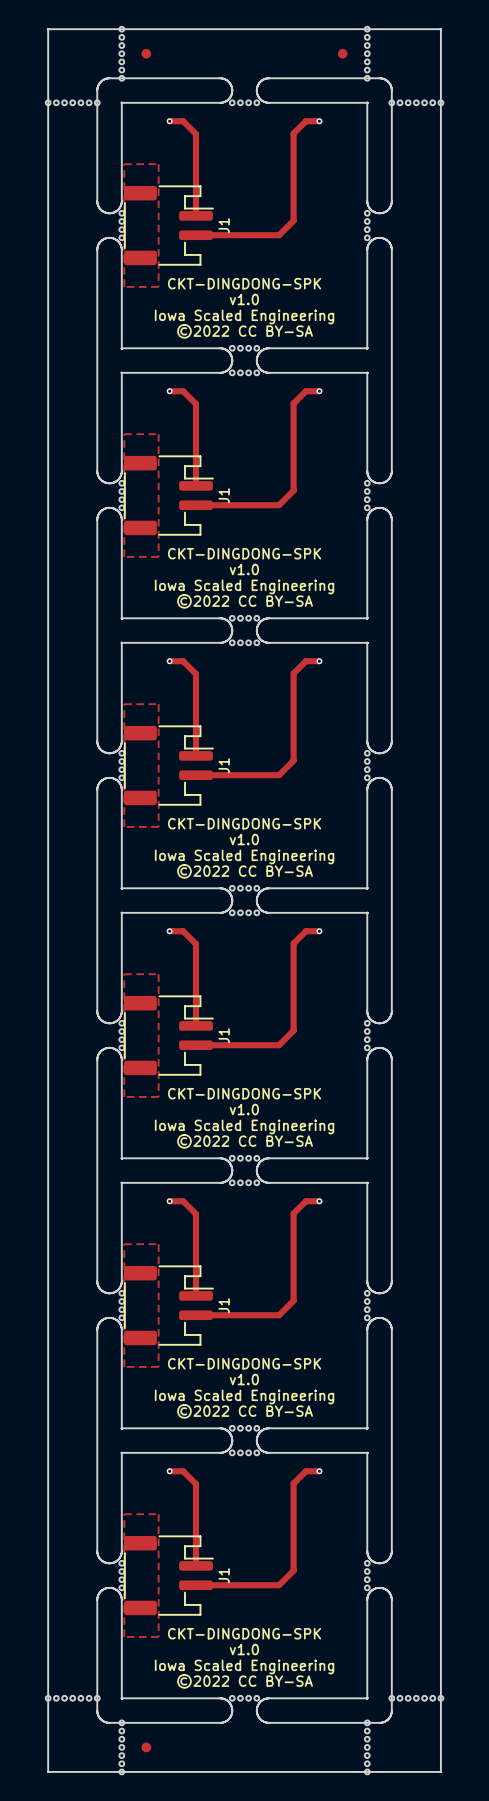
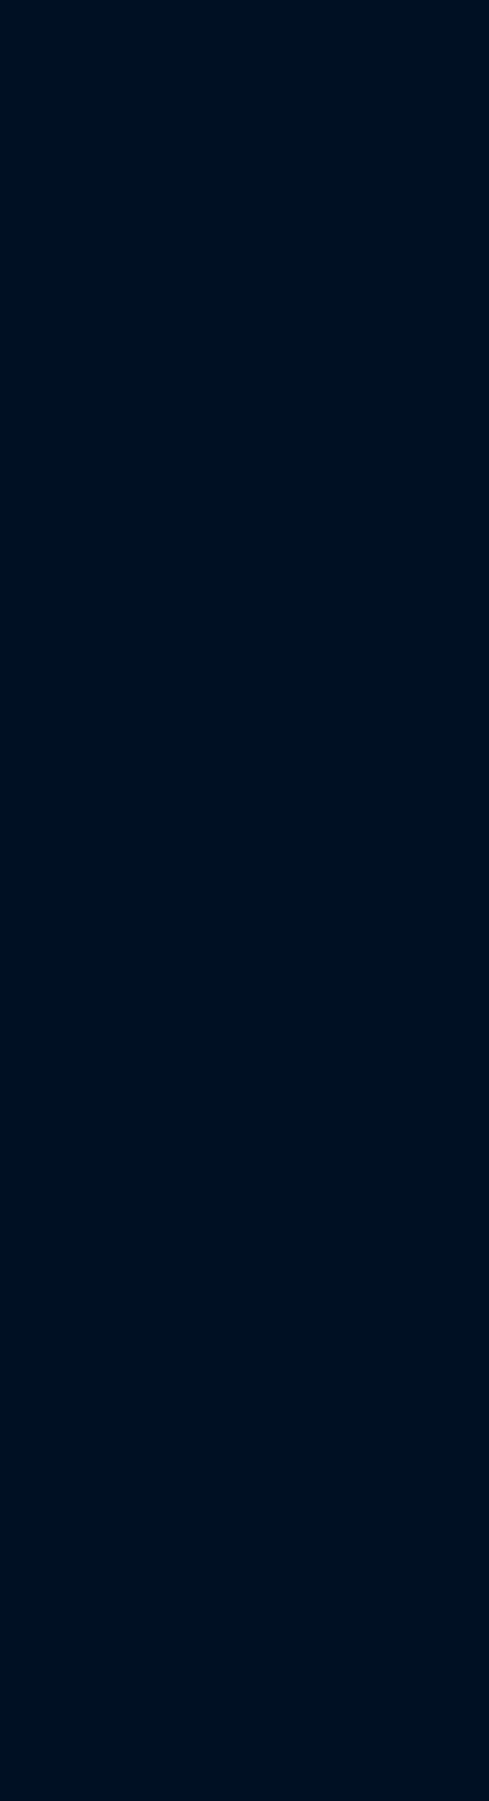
board edge: (48, 29) (440, 29) -> none
board edge: (48, 29) (48, 1771) -> none
part: (121, 29) -> none
part: (367, 29) -> none
board edge: (440, 29) (440, 1771) -> none
part: (121, 37) -> none
part: (367, 37) -> none
part: (121, 45) -> none
part: (367, 45) -> none
part: (121, 53) -> none
part: (146, 53) -> none
part: (342, 53) -> none
part: (367, 53) -> none
part: (121, 61) -> none
part: (367, 61) -> none
part: (121, 70) -> none
part: (367, 70) -> none
part: (121, 78) -> none
part: (367, 78) -> none
board edge: (232, 90) (229, 82) (220, 78) (108, 78) (100, 81) (97, 89) (97, 201) (101, 210) (109, 213) -> none
board edge: (232, 90) (229, 98) (221, 102) (121, 102) -> none
board edge: (256, 90) (259, 82) (268, 78) (380, 78) (388, 81) (391, 89) (391, 201) (387, 210) (379, 213) -> none
board edge: (256, 90) (259, 98) (267, 102) (367, 102) -> none
part: (48, 102) -> none
part: (56, 102) -> none
part: (64, 102) -> none
part: (72, 102) -> none
part: (80, 102) -> none
part: (89, 102) -> none
part: (97, 102) -> none
board edge: (121, 102) (121, 202) (117, 210) (109, 213) -> none
part: (232, 102) -> none
part: (240, 102) -> none
part: (248, 102) -> none
part: (256, 102) -> none
board edge: (367, 102) (367, 202) (371, 210) (379, 213) -> none
part: (391, 102) -> none
part: (400, 102) -> none
part: (408, 102) -> none
part: (416, 102) -> none
part: (424, 102) -> none
part: (432, 102) -> none
part: (440, 102) -> none
track: (169, 121) (183, 121) (196, 134) (196, 215) -> none
via: (169, 121) -> none
track: (319, 121) (305, 121) (293, 133) (293, 220) (279, 235) (196, 235) -> none
via: (319, 121) -> none
zone outline: (124, 164) (124, 286) (158, 286) (158, 164) (124, 164) -> none
part: (121, 213) -> none
part: (367, 213) -> none
part: (121, 221) -> none
part: (367, 221) -> none
J1: (168, 225) -> none
part: (121, 229) -> none
part: (367, 229) -> none
board edge: (109, 237) (100, 241) (97, 250) (97, 471) (101, 480) (109, 483) -> none
board edge: (109, 237) (117, 240) (121, 248) (121, 348) -> none
part: (121, 237) -> none
part: (367, 237) -> none
board edge: (379, 237) (371, 240) (367, 248) (367, 348) -> none
board edge: (379, 237) (388, 241) (391, 250) (391, 471) (387, 480) (379, 483) -> none
text: CKT-DINGDONG-SPK (244, 283) -> none
text: v1.0 (244, 299) -> none
text: Iowa Scaled Engineering (244, 316) -> none
text: ©2022 CC BY-SA (245, 331) -> none
board edge: (121, 348) (221, 348) (229, 352) (232, 360) -> none
part: (232, 348) -> none
part: (240, 348) -> none
part: (248, 348) -> none
part: (256, 348) -> none
board edge: (367, 348) (267, 348) (259, 352) (256, 360) -> none
board edge: (232, 360) (229, 368) (221, 372) (121, 372) -> none
board edge: (256, 360) (259, 368) (267, 372) (367, 372) -> none
board edge: (121, 372) (121, 472) (117, 480) (109, 483) -> none
part: (232, 372) -> none
part: (240, 372) -> none
part: (248, 372) -> none
part: (256, 372) -> none
board edge: (367, 372) (367, 472) (371, 480) (379, 483) -> none
track: (169, 391) (183, 391) (196, 404) (196, 485) -> none
via: (169, 391) -> none
track: (319, 391) (305, 391) (293, 403) (293, 490) (279, 505) (196, 505) -> none
via: (319, 391) -> none
zone outline: (124, 434) (124, 556) (158, 556) (158, 434) (124, 434) -> none
part: (121, 483) -> none
part: (367, 483) -> none
part: (121, 491) -> none
part: (367, 491) -> none
J1: (168, 495) -> none
part: (121, 499) -> none
part: (367, 499) -> none
board edge: (109, 507) (100, 511) (97, 520) (97, 741) (101, 750) (109, 753) -> none
board edge: (109, 507) (117, 510) (121, 518) (121, 618) -> none
part: (121, 507) -> none
part: (367, 507) -> none
board edge: (379, 507) (371, 510) (367, 518) (367, 618) -> none
board edge: (379, 507) (388, 511) (391, 520) (391, 741) (387, 750) (379, 753) -> none
text: CKT-DINGDONG-SPK (244, 553) -> none
text: v1.0 (244, 569) -> none
text: Iowa Scaled Engineering (244, 586) -> none
text: ©2022 CC BY-SA (245, 601) -> none
board edge: (121, 618) (221, 618) (229, 622) (232, 630) -> none
part: (232, 618) -> none
part: (240, 618) -> none
part: (248, 618) -> none
part: (256, 618) -> none
board edge: (367, 618) (267, 618) (259, 622) (256, 630) -> none
board edge: (232, 630) (229, 638) (221, 642) (121, 642) -> none
board edge: (256, 630) (259, 638) (267, 642) (367, 642) -> none
board edge: (121, 642) (121, 742) (117, 750) (109, 753) -> none
part: (232, 642) -> none
part: (240, 642) -> none
part: (248, 642) -> none
part: (256, 642) -> none
board edge: (367, 642) (367, 742) (371, 750) (379, 753) -> none
track: (169, 661) (183, 661) (196, 674) (196, 755) -> none
via: (169, 661) -> none
track: (319, 661) (305, 661) (293, 673) (293, 760) (279, 775) (196, 775) -> none
via: (319, 661) -> none
zone outline: (124, 704) (124, 826) (158, 826) (158, 704) (124, 704) -> none
part: (121, 753) -> none
part: (367, 753) -> none
part: (121, 761) -> none
part: (367, 761) -> none
J1: (168, 765) -> none
part: (121, 769) -> none
part: (367, 769) -> none
board edge: (109, 777) (100, 781) (97, 790) (97, 1011) (101, 1020) (109, 1023) -> none
board edge: (109, 777) (117, 780) (121, 788) (121, 888) -> none
part: (121, 777) -> none
part: (367, 777) -> none
board edge: (379, 777) (371, 780) (367, 788) (367, 888) -> none
board edge: (379, 777) (388, 781) (391, 790) (391, 1011) (387, 1020) (379, 1023) -> none
text: CKT-DINGDONG-SPK (244, 823) -> none
text: v1.0 (244, 839) -> none
text: Iowa Scaled Engineering (244, 856) -> none
text: ©2022 CC BY-SA (245, 871) -> none
board edge: (121, 888) (221, 888) (229, 892) (232, 900) -> none
part: (232, 888) -> none
part: (240, 888) -> none
part: (248, 888) -> none
part: (256, 888) -> none
board edge: (367, 888) (267, 888) (259, 892) (256, 900) -> none
board edge: (232, 900) (229, 908) (221, 912) (121, 912) -> none
board edge: (256, 900) (259, 908) (267, 912) (367, 912) -> none
board edge: (121, 912) (121, 1012) (117, 1020) (109, 1023) -> none
part: (232, 912) -> none
part: (240, 912) -> none
part: (248, 912) -> none
part: (256, 912) -> none
board edge: (367, 912) (367, 1012) (371, 1020) (379, 1023) -> none
track: (169, 931) (183, 931) (196, 944) (196, 1025) -> none
via: (169, 931) -> none
track: (319, 931) (305, 931) (293, 943) (293, 1030) (279, 1045) (196, 1045) -> none
via: (319, 931) -> none
zone outline: (124, 974) (124, 1096) (158, 1096) (158, 974) (124, 974) -> none
part: (121, 1023) -> none
part: (367, 1023) -> none
part: (121, 1031) -> none
part: (367, 1031) -> none
J1: (168, 1035) -> none
part: (121, 1039) -> none
part: (367, 1039) -> none
board edge: (109, 1047) (100, 1051) (97, 1060) (97, 1281) (101, 1290) (109, 1293) -> none
board edge: (109, 1047) (117, 1050) (121, 1058) (121, 1158) -> none
part: (121, 1047) -> none
part: (367, 1047) -> none
board edge: (379, 1047) (371, 1050) (367, 1058) (367, 1158) -> none
board edge: (379, 1047) (388, 1051) (391, 1060) (391, 1281) (387, 1290) (379, 1293) -> none
text: CKT-DINGDONG-SPK (244, 1093) -> none
text: v1.0 (244, 1109) -> none
text: Iowa Scaled Engineering (244, 1126) -> none
text: ©2022 CC BY-SA (245, 1141) -> none
board edge: (121, 1158) (221, 1158) (229, 1162) (232, 1170) -> none
part: (232, 1158) -> none
part: (240, 1158) -> none
part: (248, 1158) -> none
part: (256, 1158) -> none
board edge: (367, 1158) (267, 1158) (259, 1162) (256, 1170) -> none
board edge: (232, 1170) (229, 1178) (221, 1182) (121, 1182) -> none
board edge: (256, 1170) (259, 1178) (267, 1182) (367, 1182) -> none
board edge: (121, 1182) (121, 1282) (117, 1290) (109, 1293) -> none
part: (232, 1182) -> none
part: (240, 1182) -> none
part: (248, 1182) -> none
part: (256, 1182) -> none
board edge: (367, 1182) (367, 1282) (371, 1290) (379, 1293) -> none
track: (169, 1201) (183, 1201) (196, 1214) (196, 1295) -> none
via: (169, 1201) -> none
track: (319, 1201) (305, 1201) (293, 1213) (293, 1300) (279, 1315) (196, 1315) -> none
via: (319, 1201) -> none
zone outline: (124, 1244) (124, 1366) (158, 1366) (158, 1244) (124, 1244) -> none
part: (121, 1293) -> none
part: (367, 1293) -> none
part: (121, 1301) -> none
part: (367, 1301) -> none
J1: (168, 1305) -> none
part: (121, 1309) -> none
part: (367, 1309) -> none
board edge: (109, 1317) (100, 1321) (97, 1330) (97, 1551) (101, 1560) (109, 1563) -> none
board edge: (109, 1317) (117, 1321) (121, 1328) (121, 1428) -> none
part: (121, 1317) -> none
part: (367, 1317) -> none
board edge: (379, 1317) (371, 1321) (367, 1328) (367, 1428) -> none
board edge: (379, 1317) (388, 1321) (391, 1330) (391, 1551) (387, 1560) (379, 1563) -> none
text: CKT-DINGDONG-SPK (244, 1363) -> none
text: v1.0 (244, 1379) -> none
text: Iowa Scaled Engineering (244, 1396) -> none
text: ©2022 CC BY-SA (245, 1411) -> none
board edge: (121, 1428) (221, 1428) (229, 1432) (232, 1440) -> none
part: (232, 1428) -> none
part: (240, 1428) -> none
part: (248, 1428) -> none
part: (256, 1428) -> none
board edge: (367, 1428) (267, 1428) (259, 1432) (256, 1440) -> none
board edge: (232, 1440) (229, 1448) (221, 1452) (121, 1452) -> none
board edge: (256, 1440) (259, 1448) (267, 1452) (367, 1452) -> none
part: (232, 1452) -> none
part: (240, 1452) -> none
part: (248, 1452) -> none
part: (256, 1452) -> none
board edge: (121, 1453) (121, 1552) (117, 1560) (109, 1563) -> none
board edge: (367, 1453) (367, 1552) (371, 1560) (379, 1563) -> none
track: (169, 1471) (183, 1471) (196, 1484) (196, 1565) -> none
via: (169, 1471) -> none
track: (319, 1471) (305, 1471) (293, 1483) (293, 1570) (279, 1585) (196, 1585) -> none
via: (319, 1471) -> none
zone outline: (124, 1514) (124, 1636) (158, 1636) (158, 1514) (124, 1514) -> none
part: (121, 1563) -> none
part: (367, 1563) -> none
part: (121, 1571) -> none
part: (367, 1571) -> none
J1: (168, 1575) -> none
part: (121, 1579) -> none
part: (367, 1579) -> none
board edge: (109, 1587) (101, 1591) (97, 1599) (97, 1711) (100, 1719) (108, 1722) (220, 1722) (229, 1718) (232, 1710) -> none
board edge: (109, 1587) (117, 1591) (121, 1598) (121, 1698) -> none
part: (121, 1587) -> none
part: (367, 1587) -> none
board edge: (379, 1587) (371, 1591) (367, 1598) (367, 1698) -> none
board edge: (379, 1587) (387, 1591) (391, 1599) (391, 1711) (388, 1719) (380, 1722) (268, 1722) (259, 1718) (256, 1710) -> none
text: CKT-DINGDONG-SPK (244, 1633) -> none
text: v1.0 (244, 1649) -> none
text: Iowa Scaled Engineering (244, 1666) -> none
text: ©2022 CC BY-SA (245, 1681) -> none
part: (48, 1698) -> none
part: (56, 1698) -> none
part: (64, 1698) -> none
part: (72, 1698) -> none
part: (80, 1698) -> none
part: (89, 1698) -> none
part: (97, 1698) -> none
board edge: (121, 1698) (221, 1698) (229, 1702) (232, 1710) -> none
part: (232, 1698) -> none
part: (240, 1698) -> none
part: (248, 1698) -> none
part: (256, 1698) -> none
board edge: (367, 1698) (267, 1698) (259, 1702) (256, 1710) -> none
part: (391, 1698) -> none
part: (400, 1698) -> none
part: (408, 1698) -> none
part: (416, 1698) -> none
part: (424, 1698) -> none
part: (432, 1698) -> none
part: (440, 1698) -> none
part: (121, 1722) -> none
part: (367, 1722) -> none
part: (121, 1731) -> none
part: (367, 1731) -> none
part: (121, 1739) -> none
part: (367, 1739) -> none
part: (121, 1747) -> none
part: (146, 1747) -> none
part: (367, 1747) -> none
part: (121, 1755) -> none
part: (367, 1755) -> none
part: (121, 1763) -> none
part: (367, 1763) -> none
board edge: (48, 1771) (440, 1771) -> none
part: (121, 1771) -> none
part: (367, 1771) -> none

